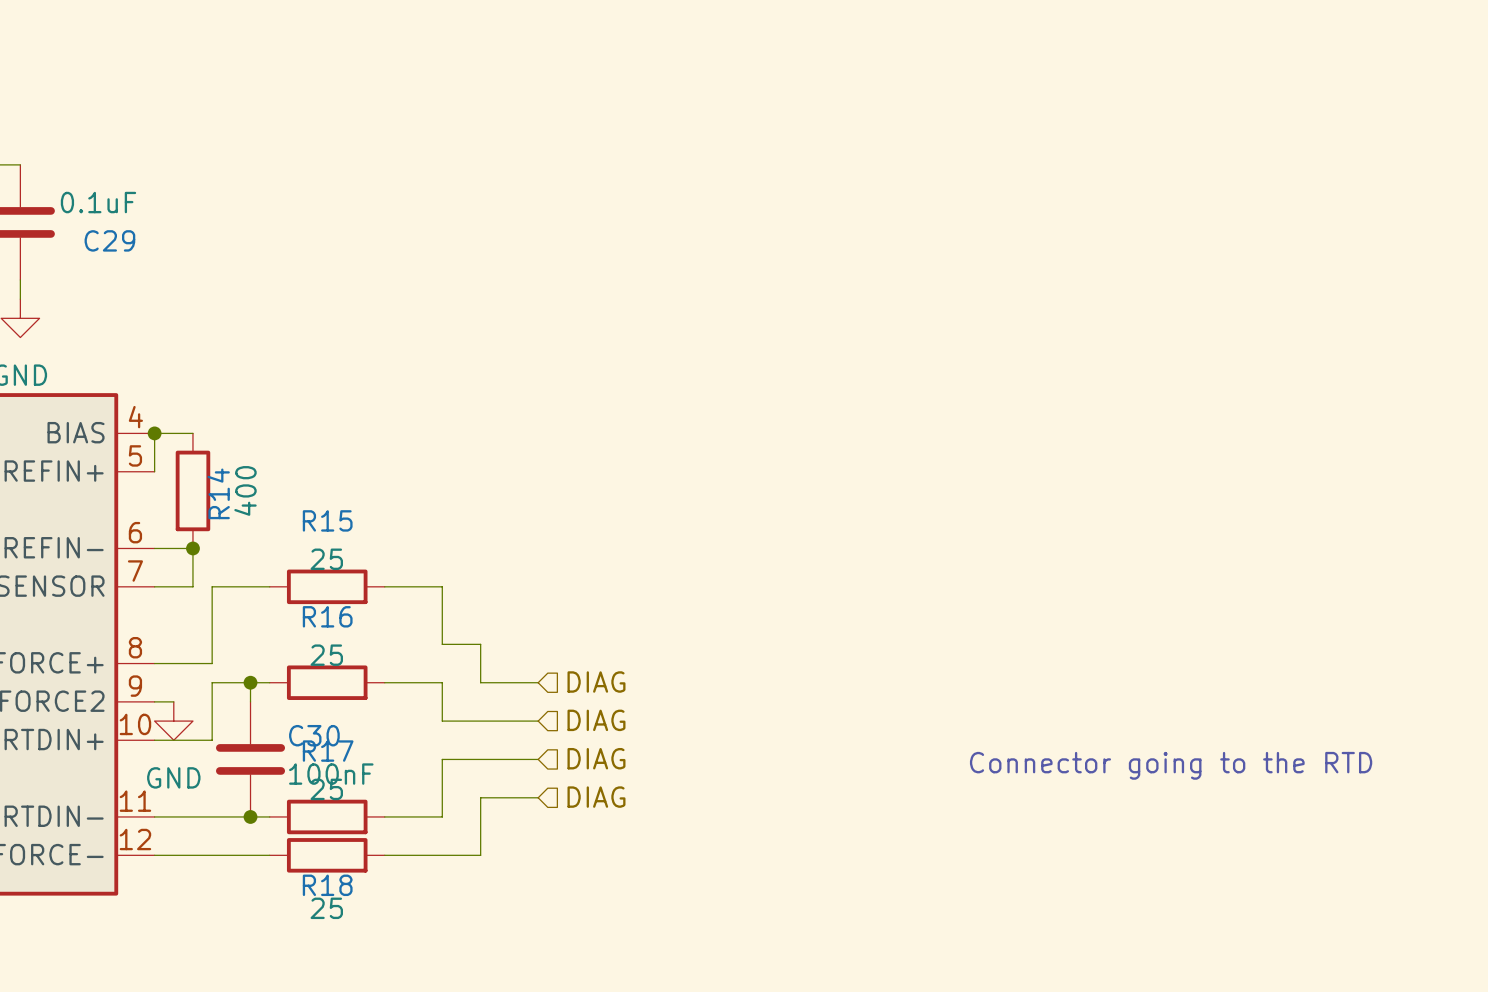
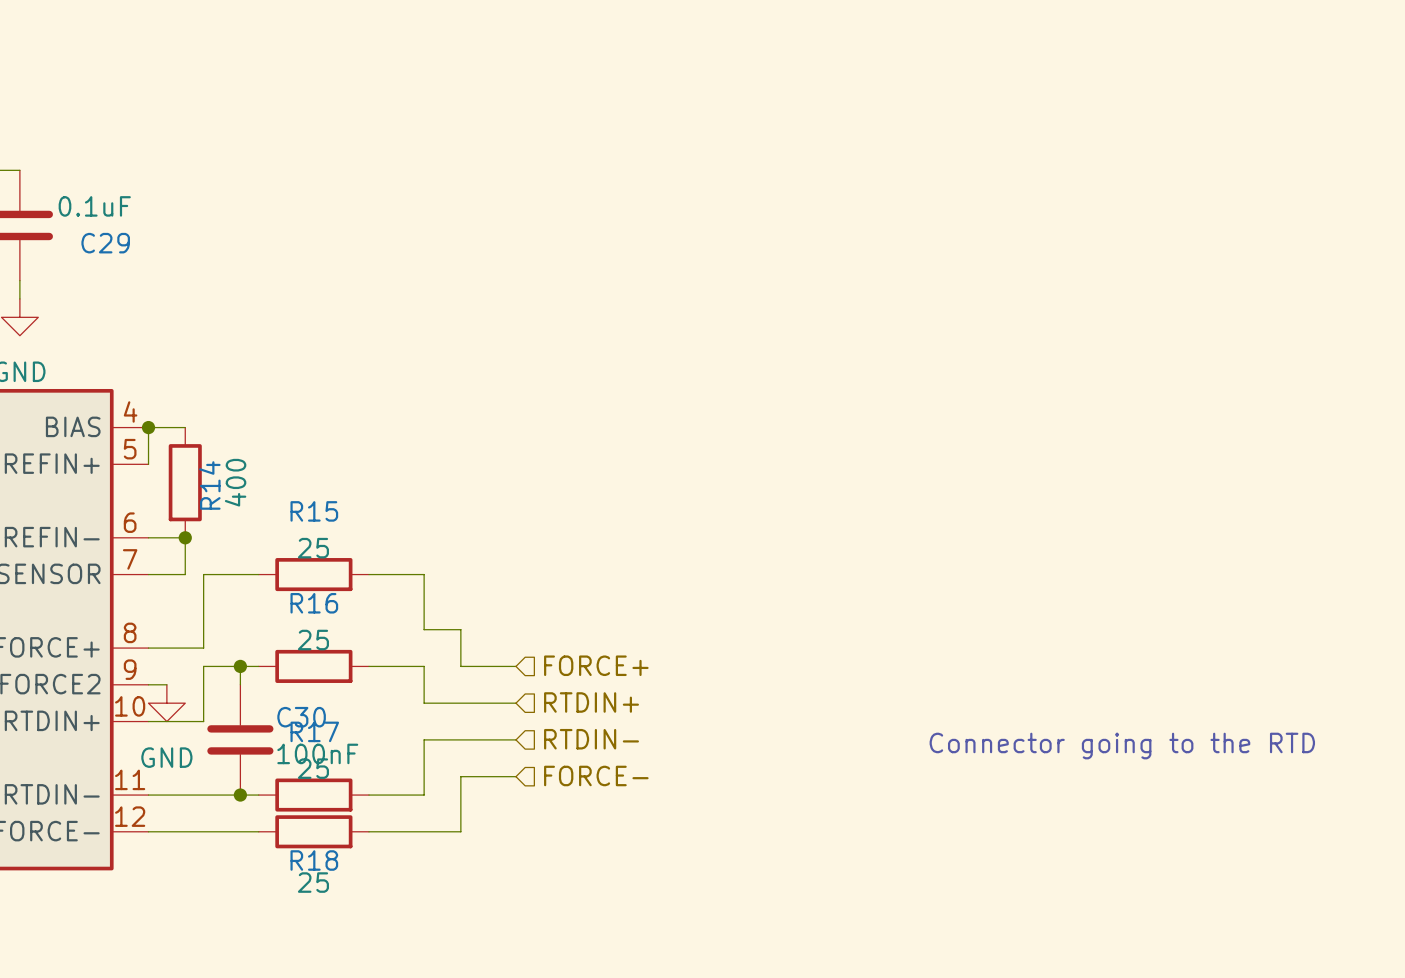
hierarchical label: DIAG (596, 682) -> FORCE+ (596, 665)
hierarchical label: DIAG (596, 720) -> RTDIN+ (591, 702)
hierarchical label: DIAG (596, 758) -> RTDIN- (591, 739)
hierarchical label: DIAG (596, 797) -> FORCE- (596, 775)

